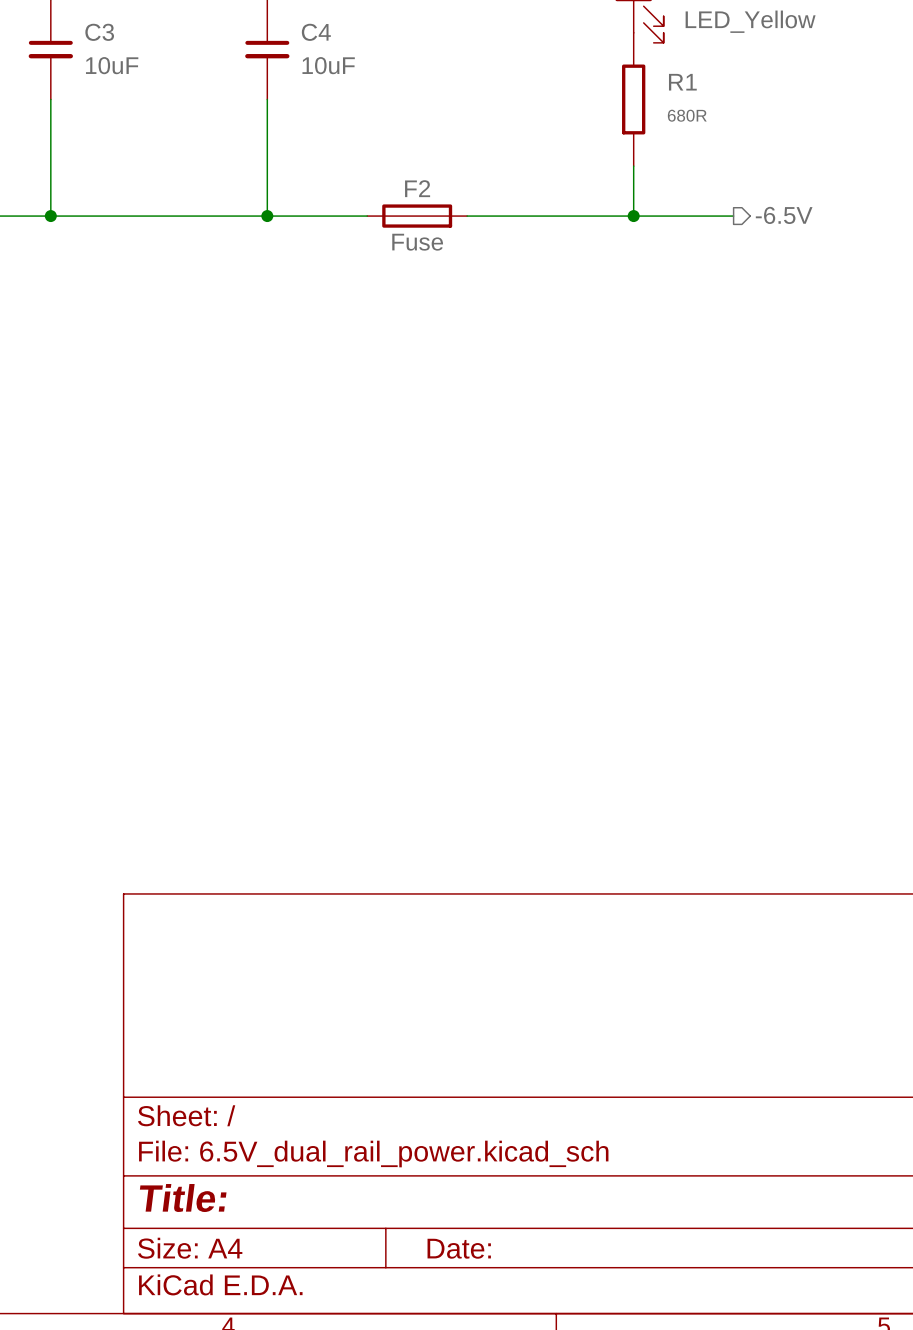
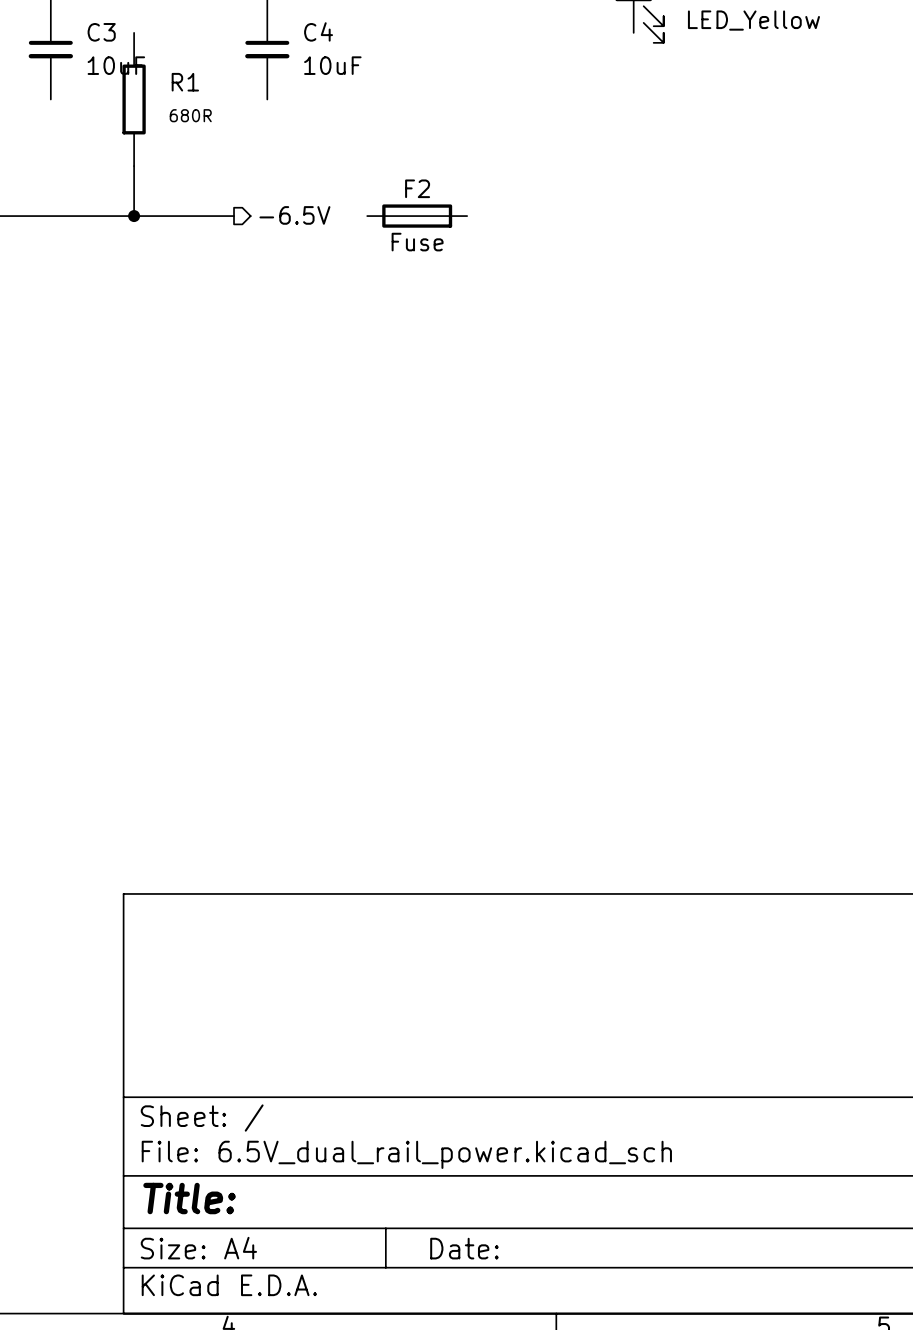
wire: (50, 99) (50, 216) -> none
wire: (267, 99) (267, 216) -> none
R1 position: (633, 99) -> (134, 99)
wire: none -> (134, 166) (134, 216)
wire: (633, 166) (633, 216) -> none
hierarchical label: none -> -6.5V (294, 215)
hierarchical label: -6.5V (784, 215) -> none
junction: (50, 216) -> none
junction: none -> (134, 216)
wire: (234, 216) (367, 216) -> none
junction: (267, 216) -> none
wire: (467, 216) (733, 216) -> none
junction: (633, 216) -> none

